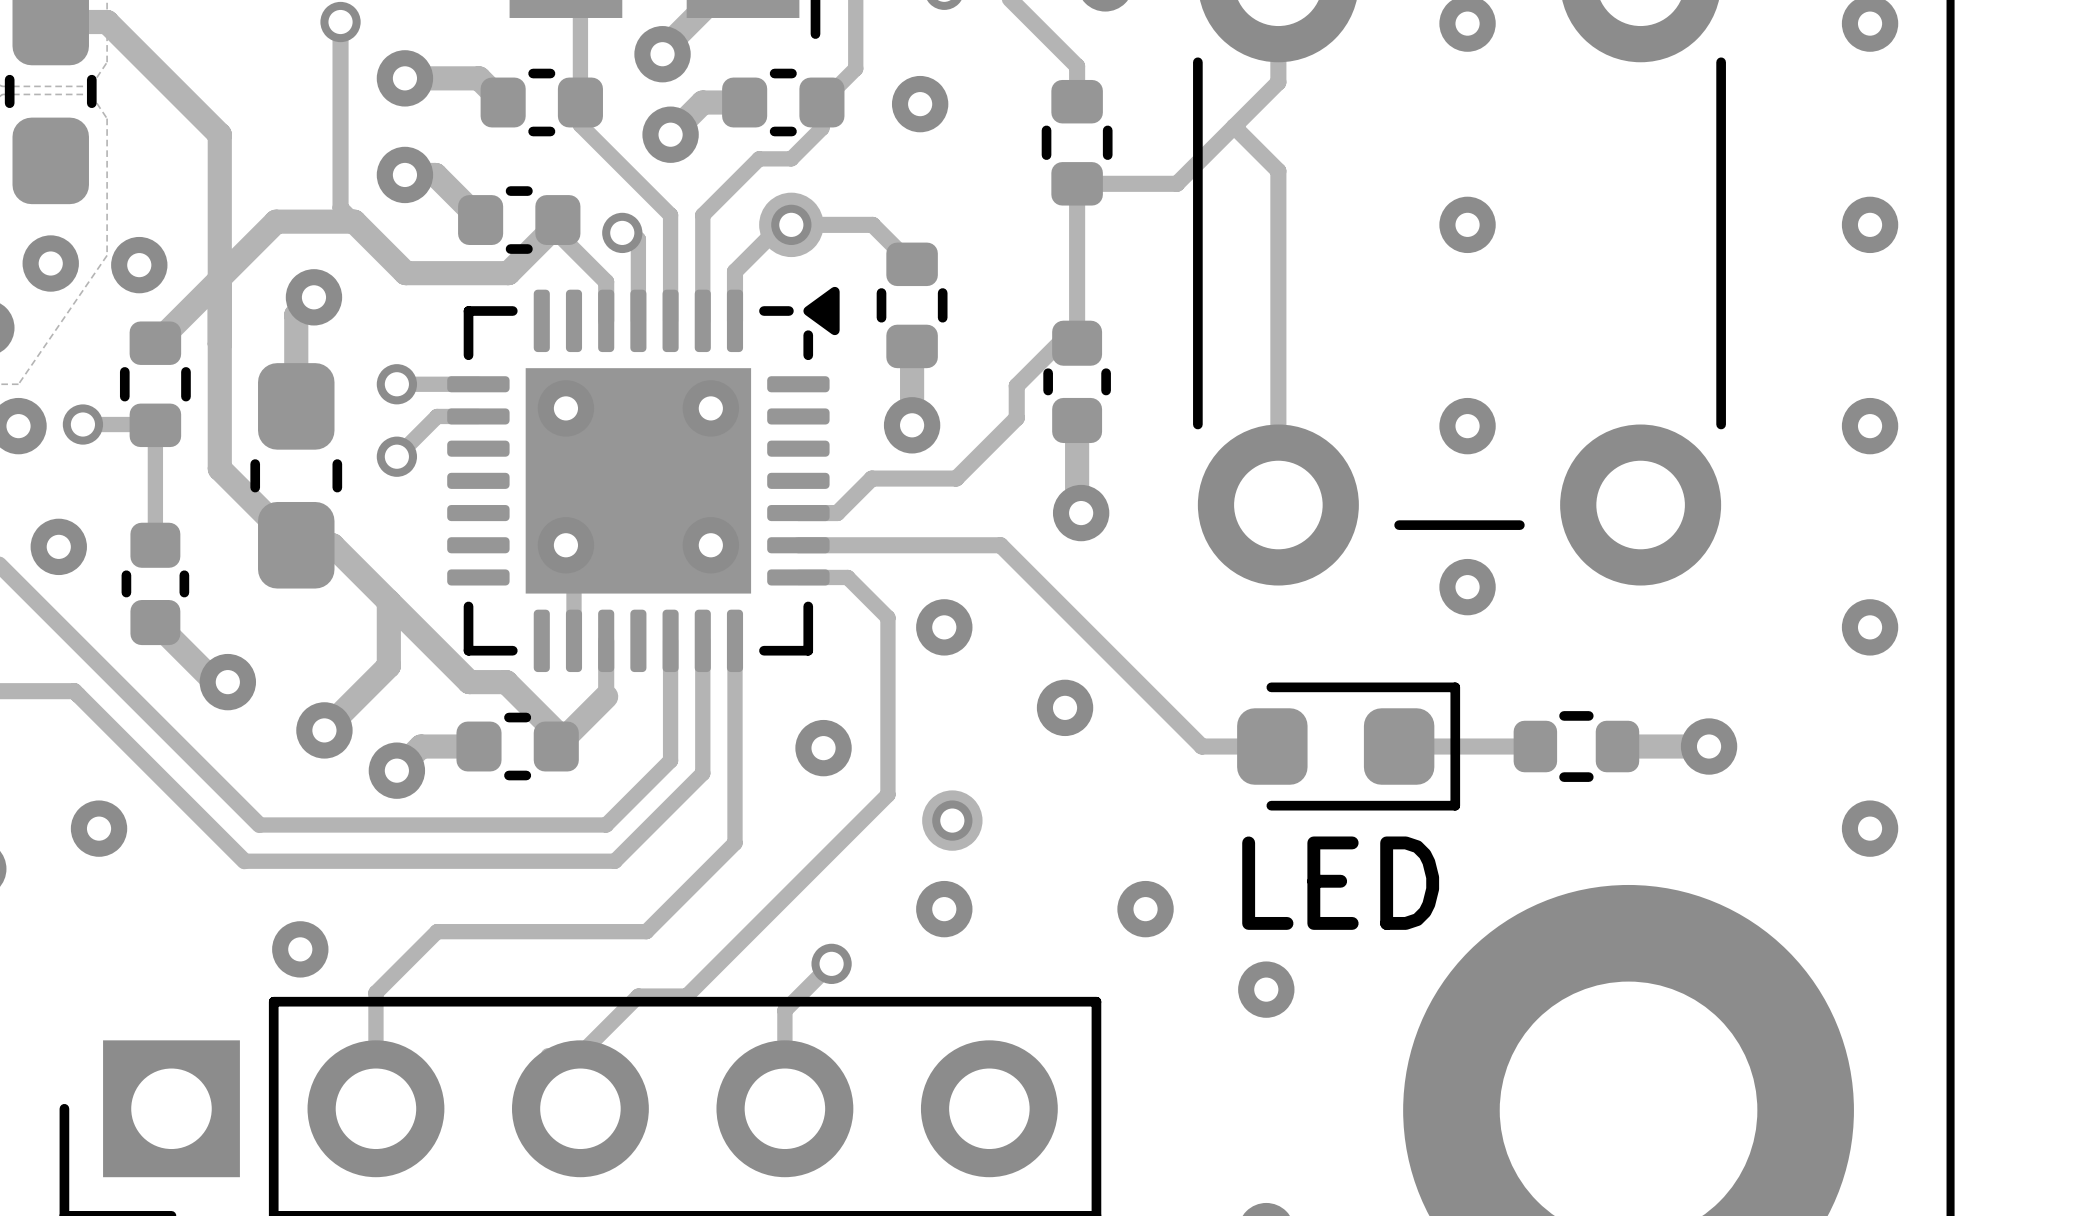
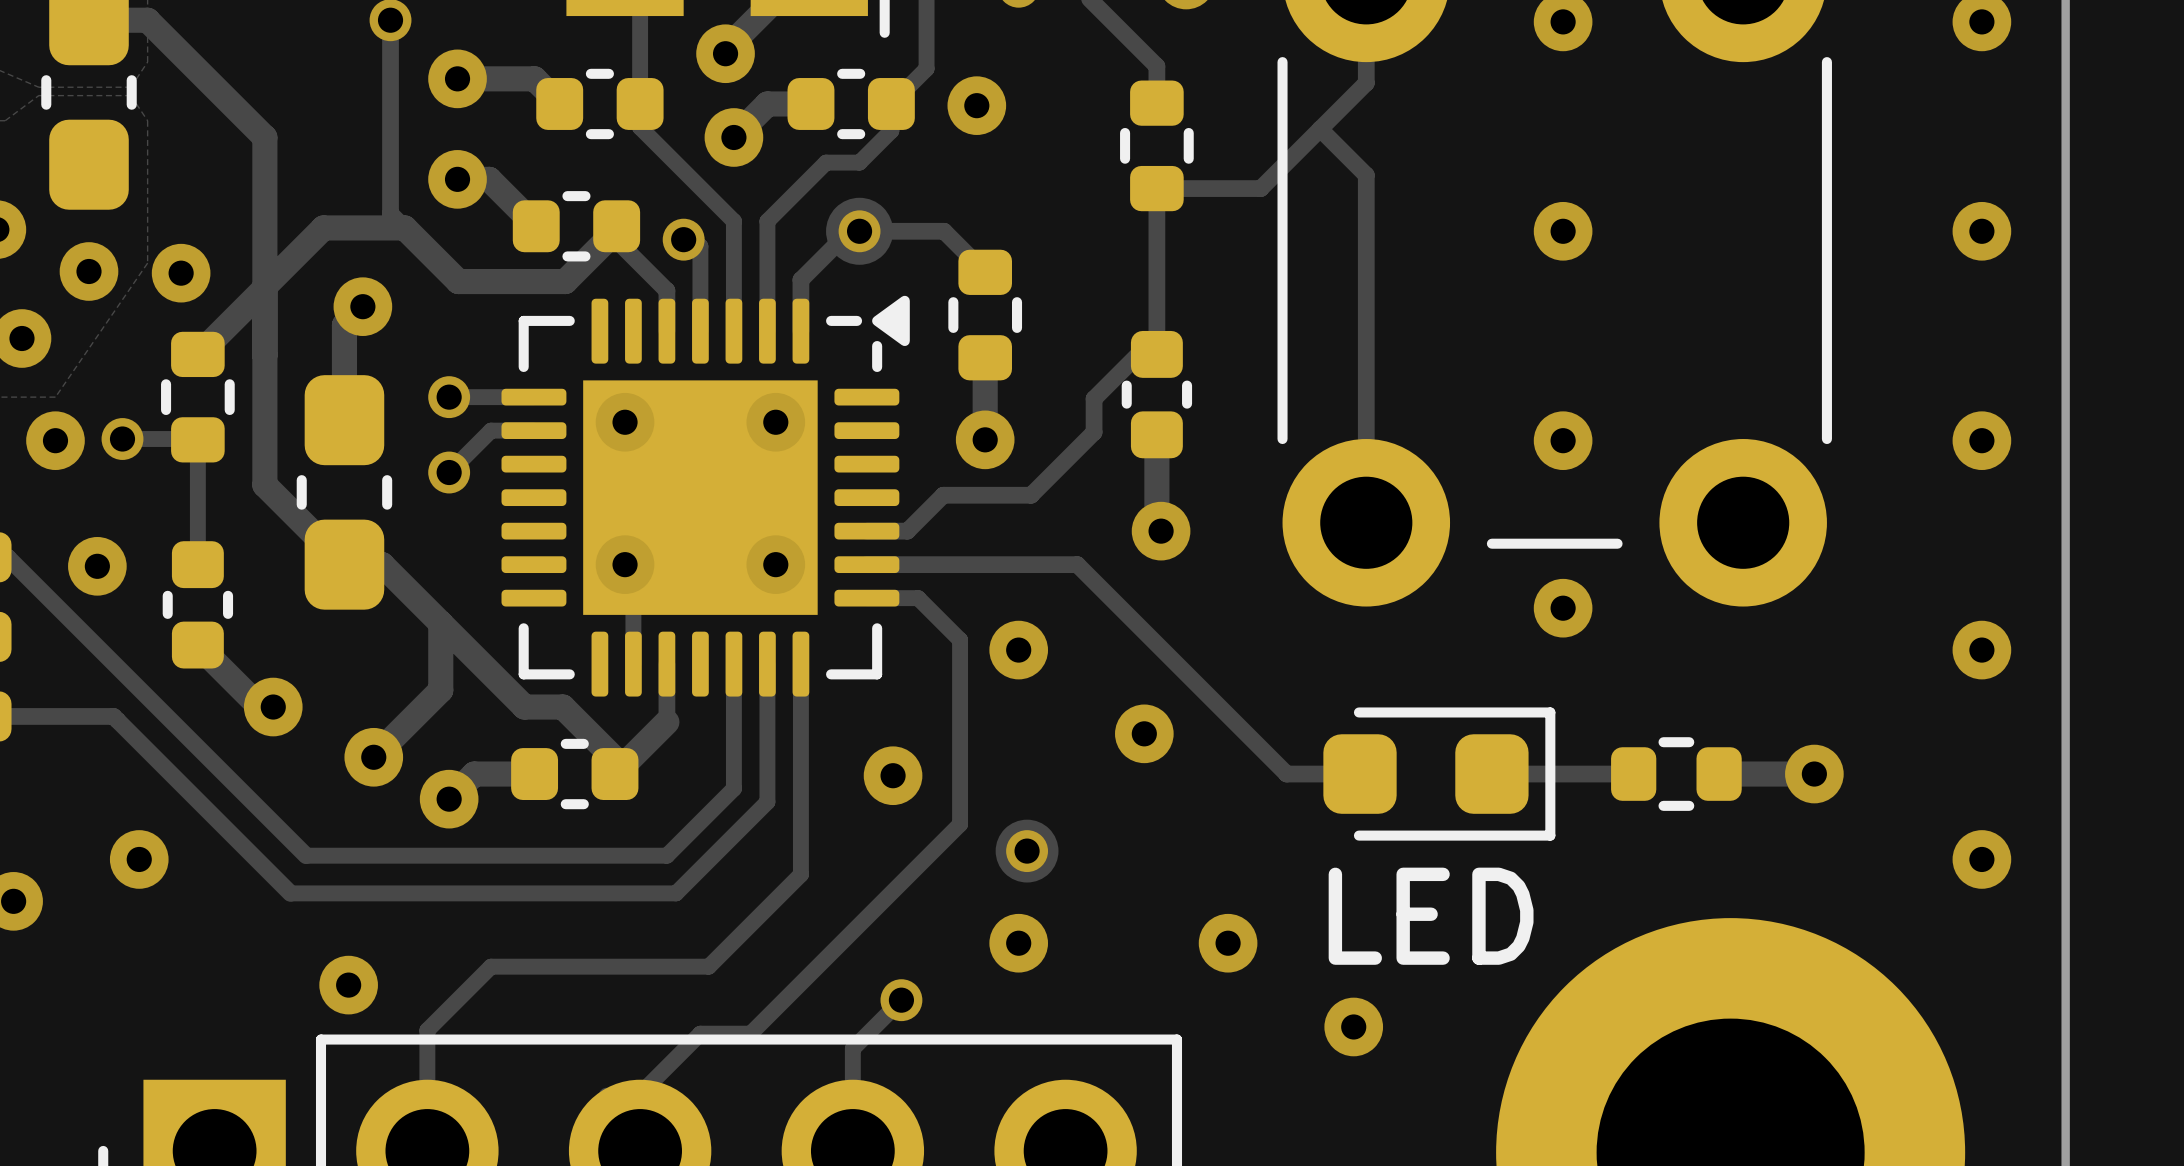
via position: (920, 104) -> (976, 105)

